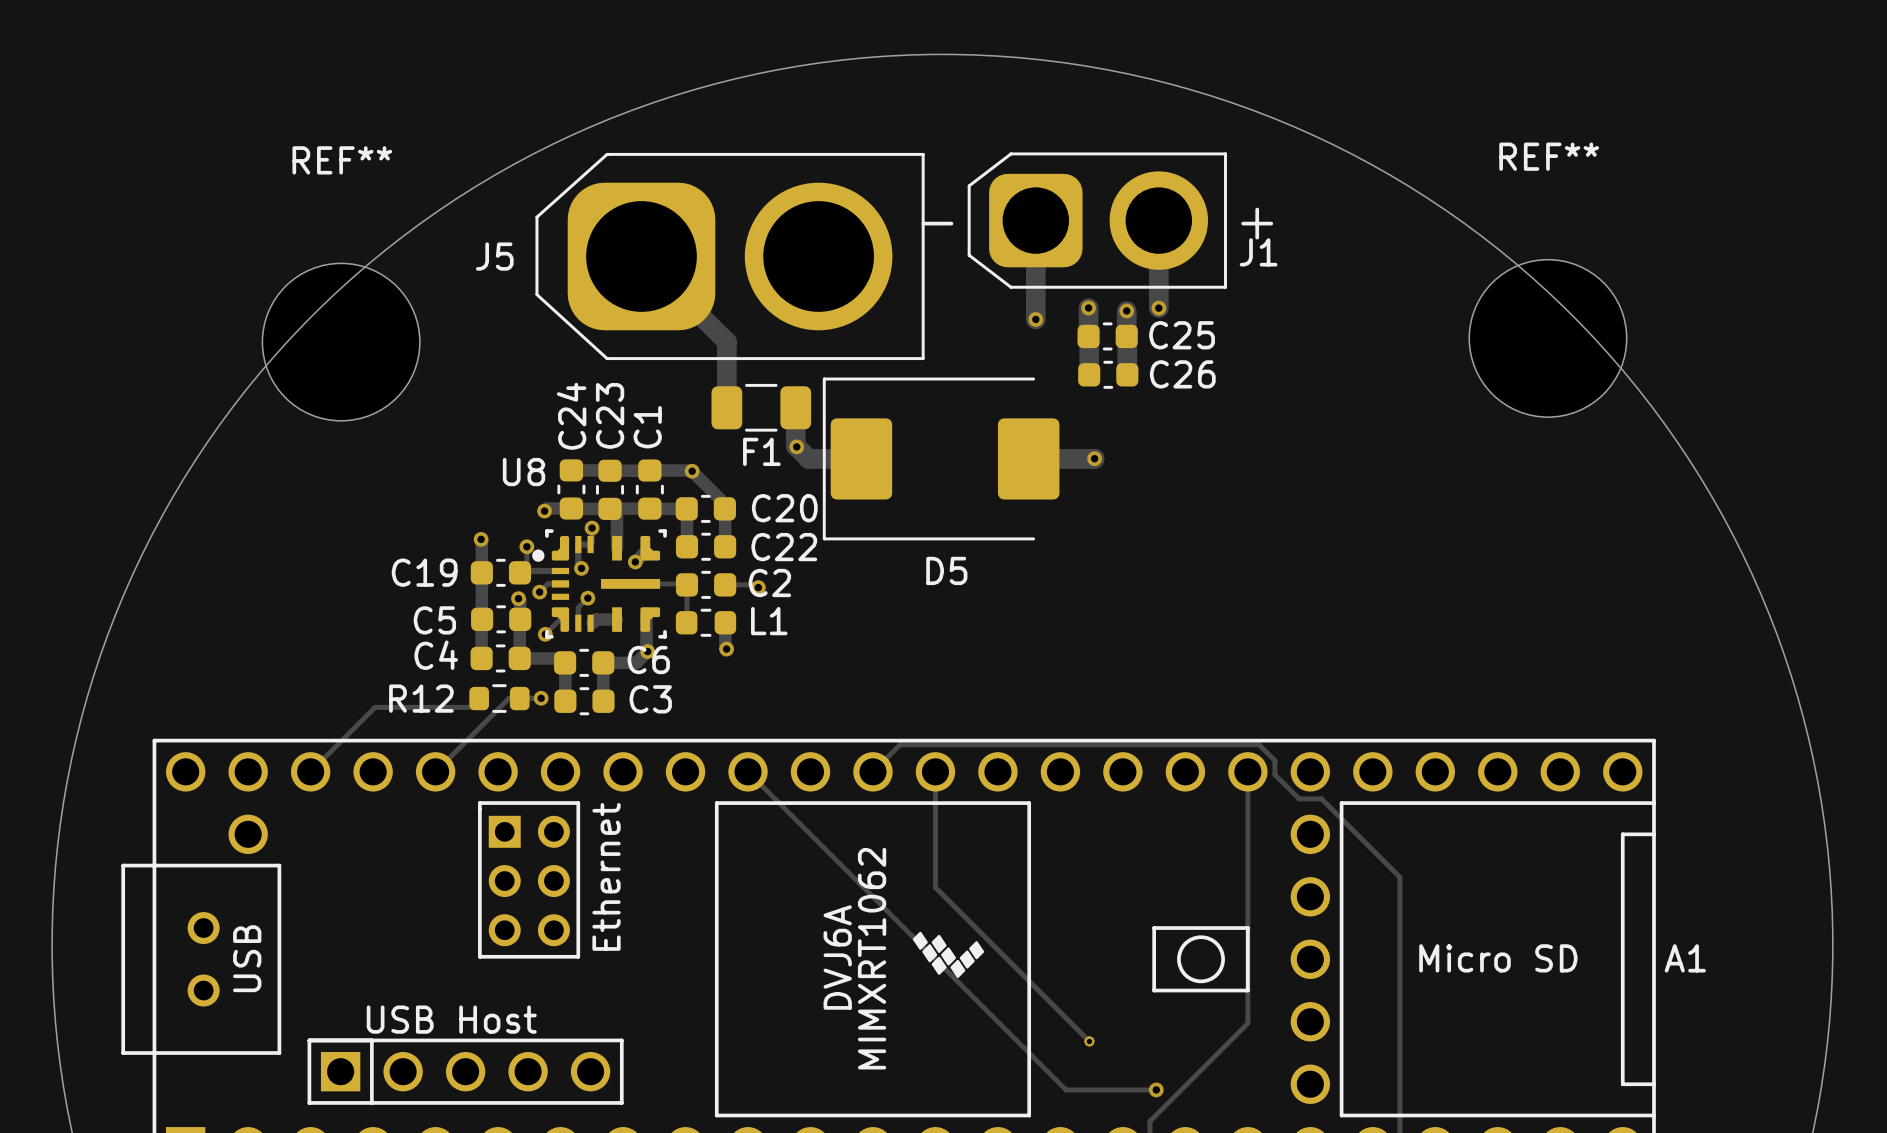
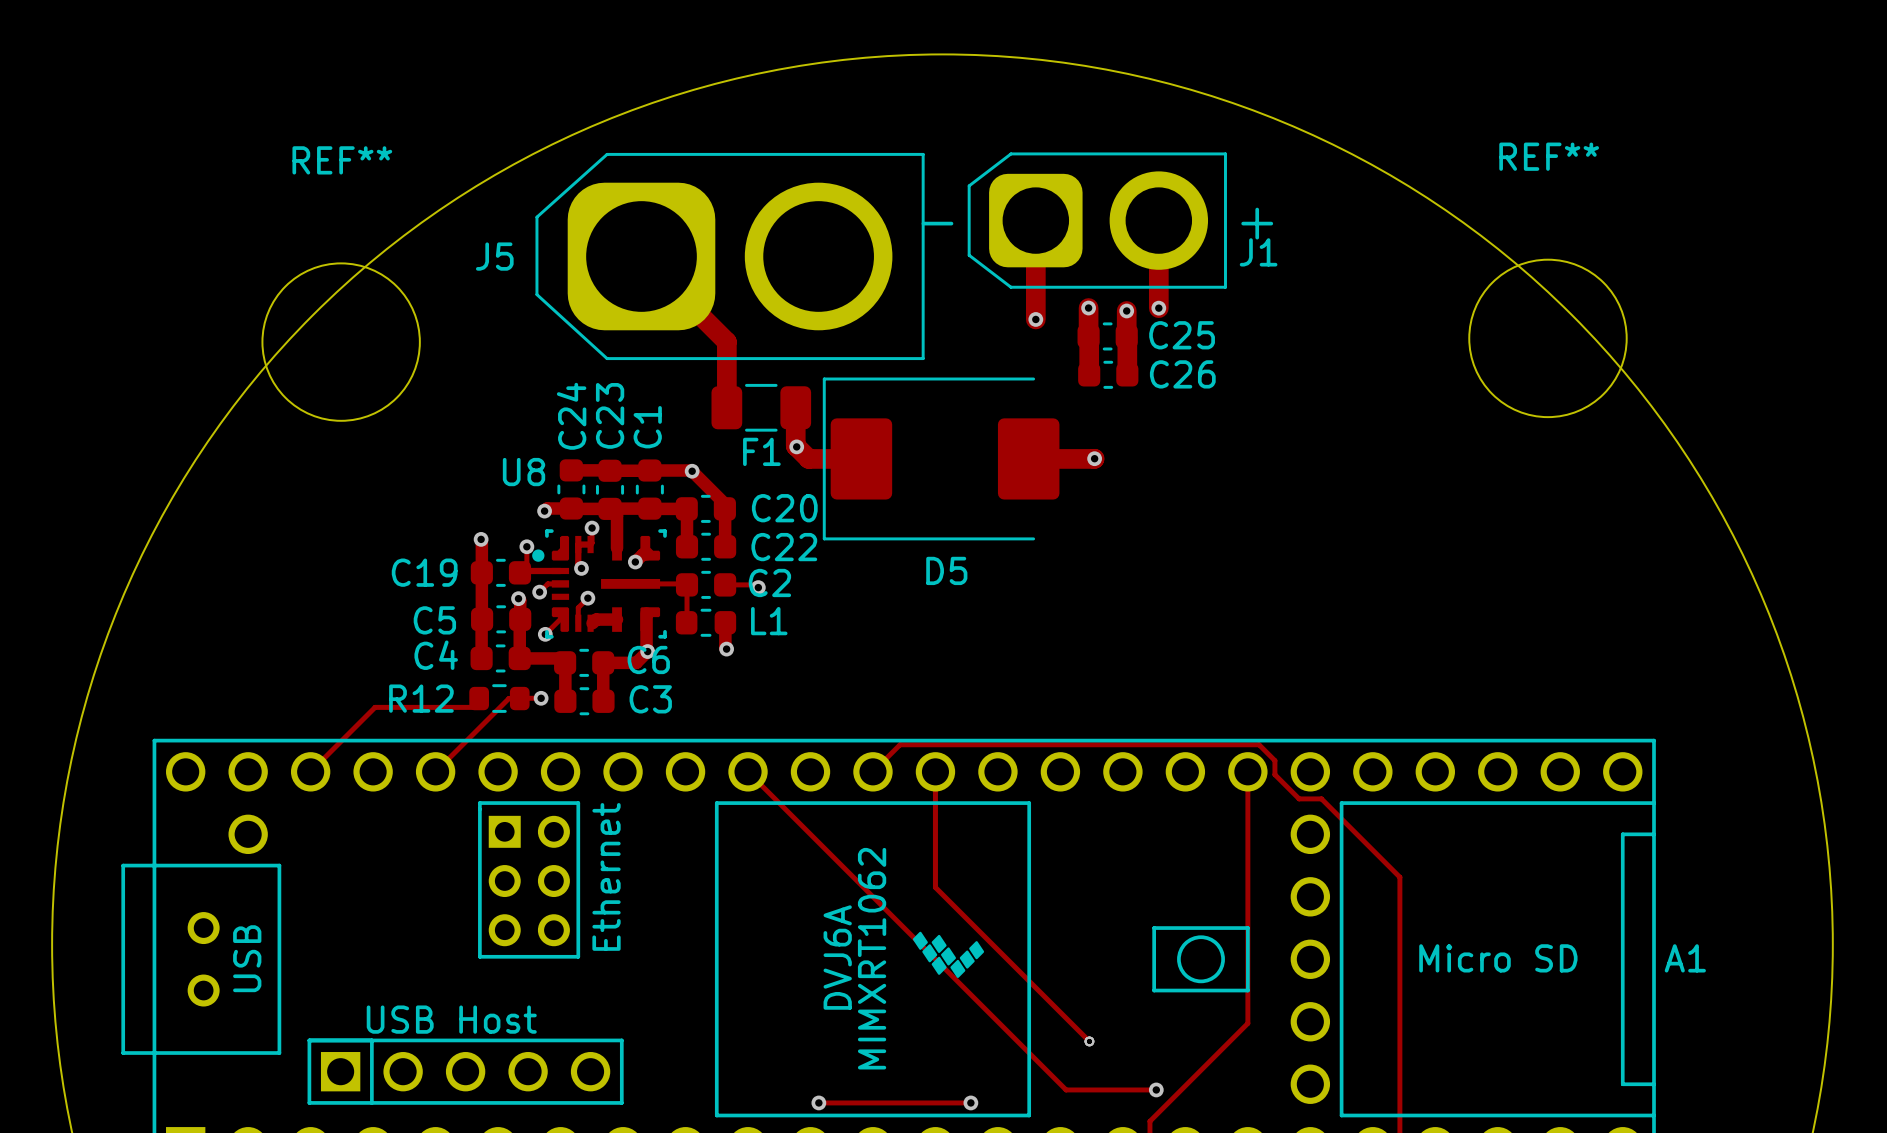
track: none -> (816, 1102) (970, 1102)
via: none -> (818, 1102)
via: none -> (970, 1102)

